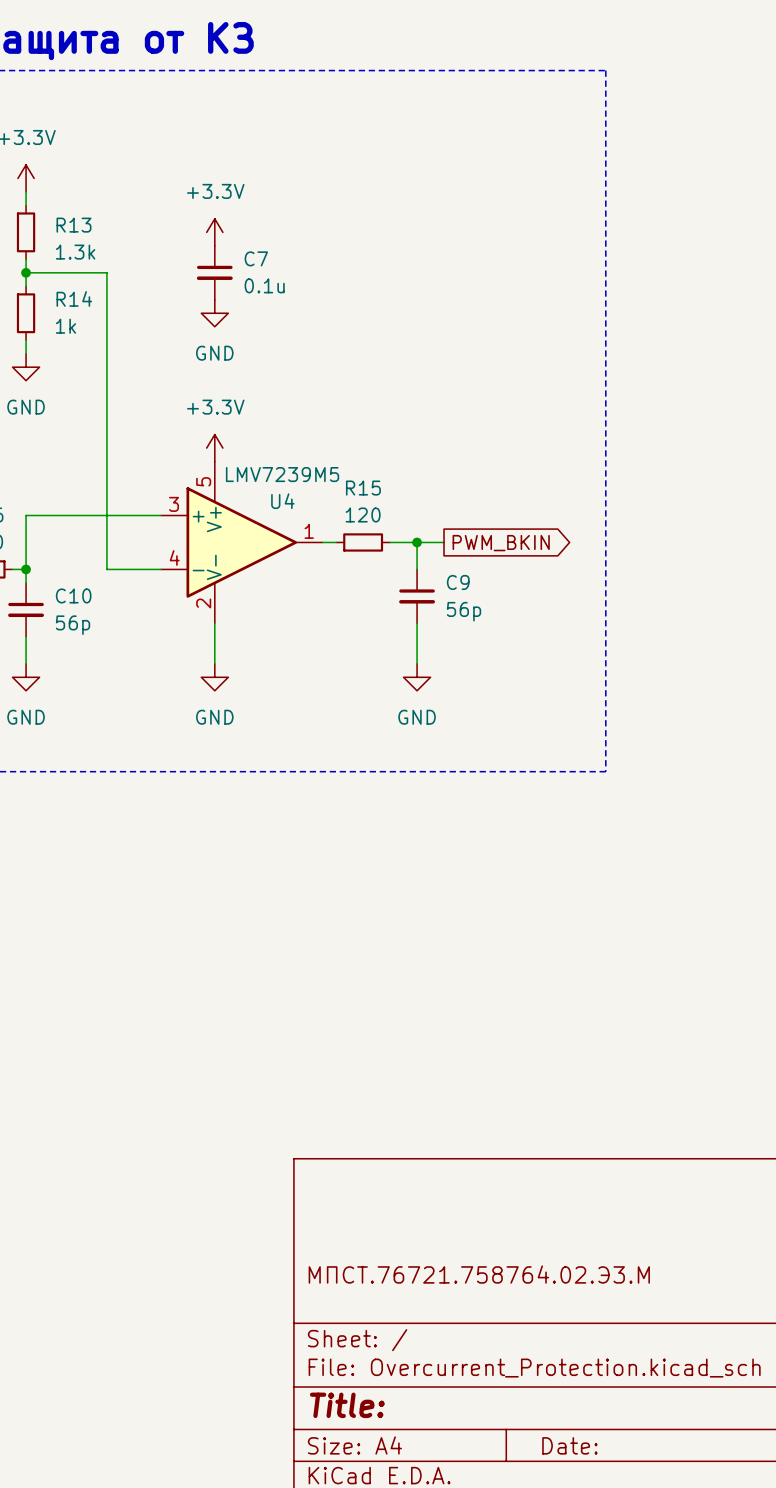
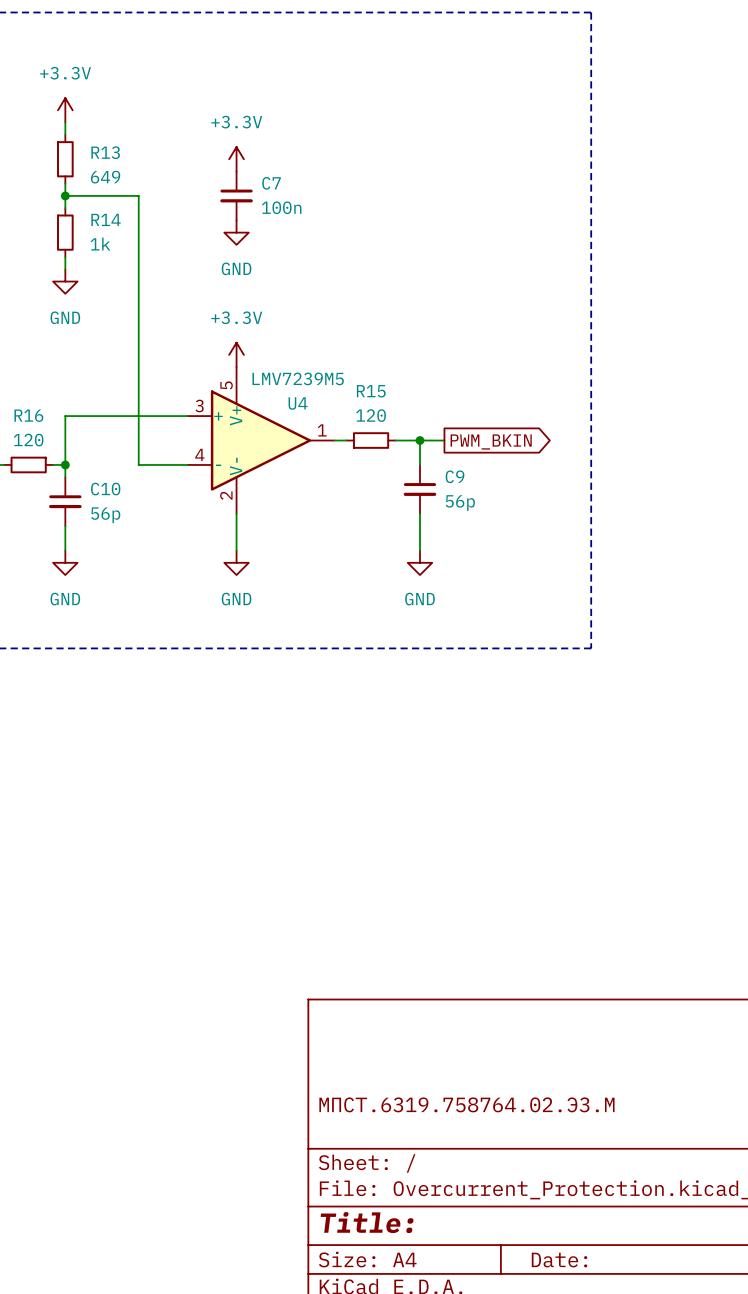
R13 value: 1.3k (75, 252) -> 649 (105, 177)
C7 value: 0.1u (264, 285) -> 100n (281, 207)
title block: МПСТ.76721.758764.02.Э3.М (479, 1274) -> МПСТ.6319.758764.02.Э3.М (466, 1104)

